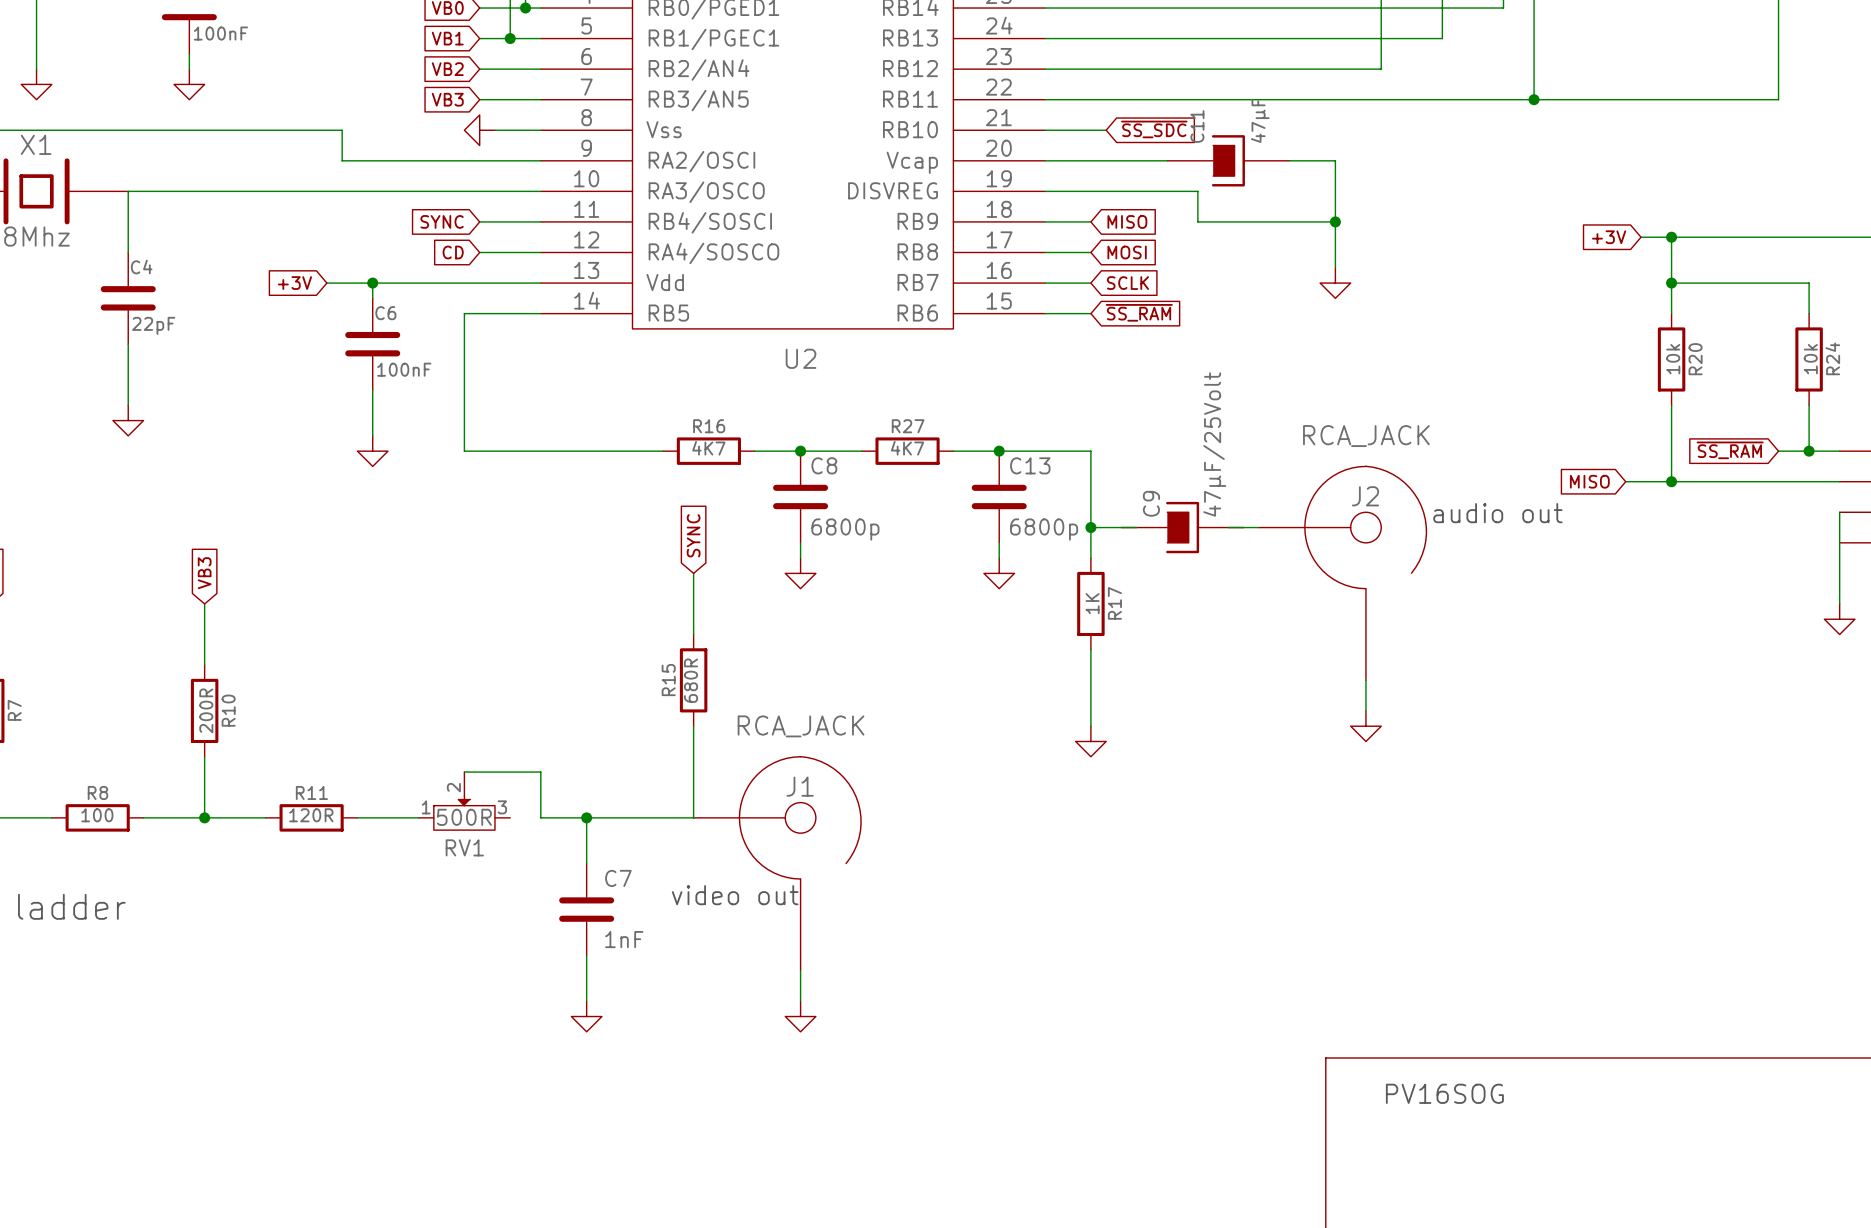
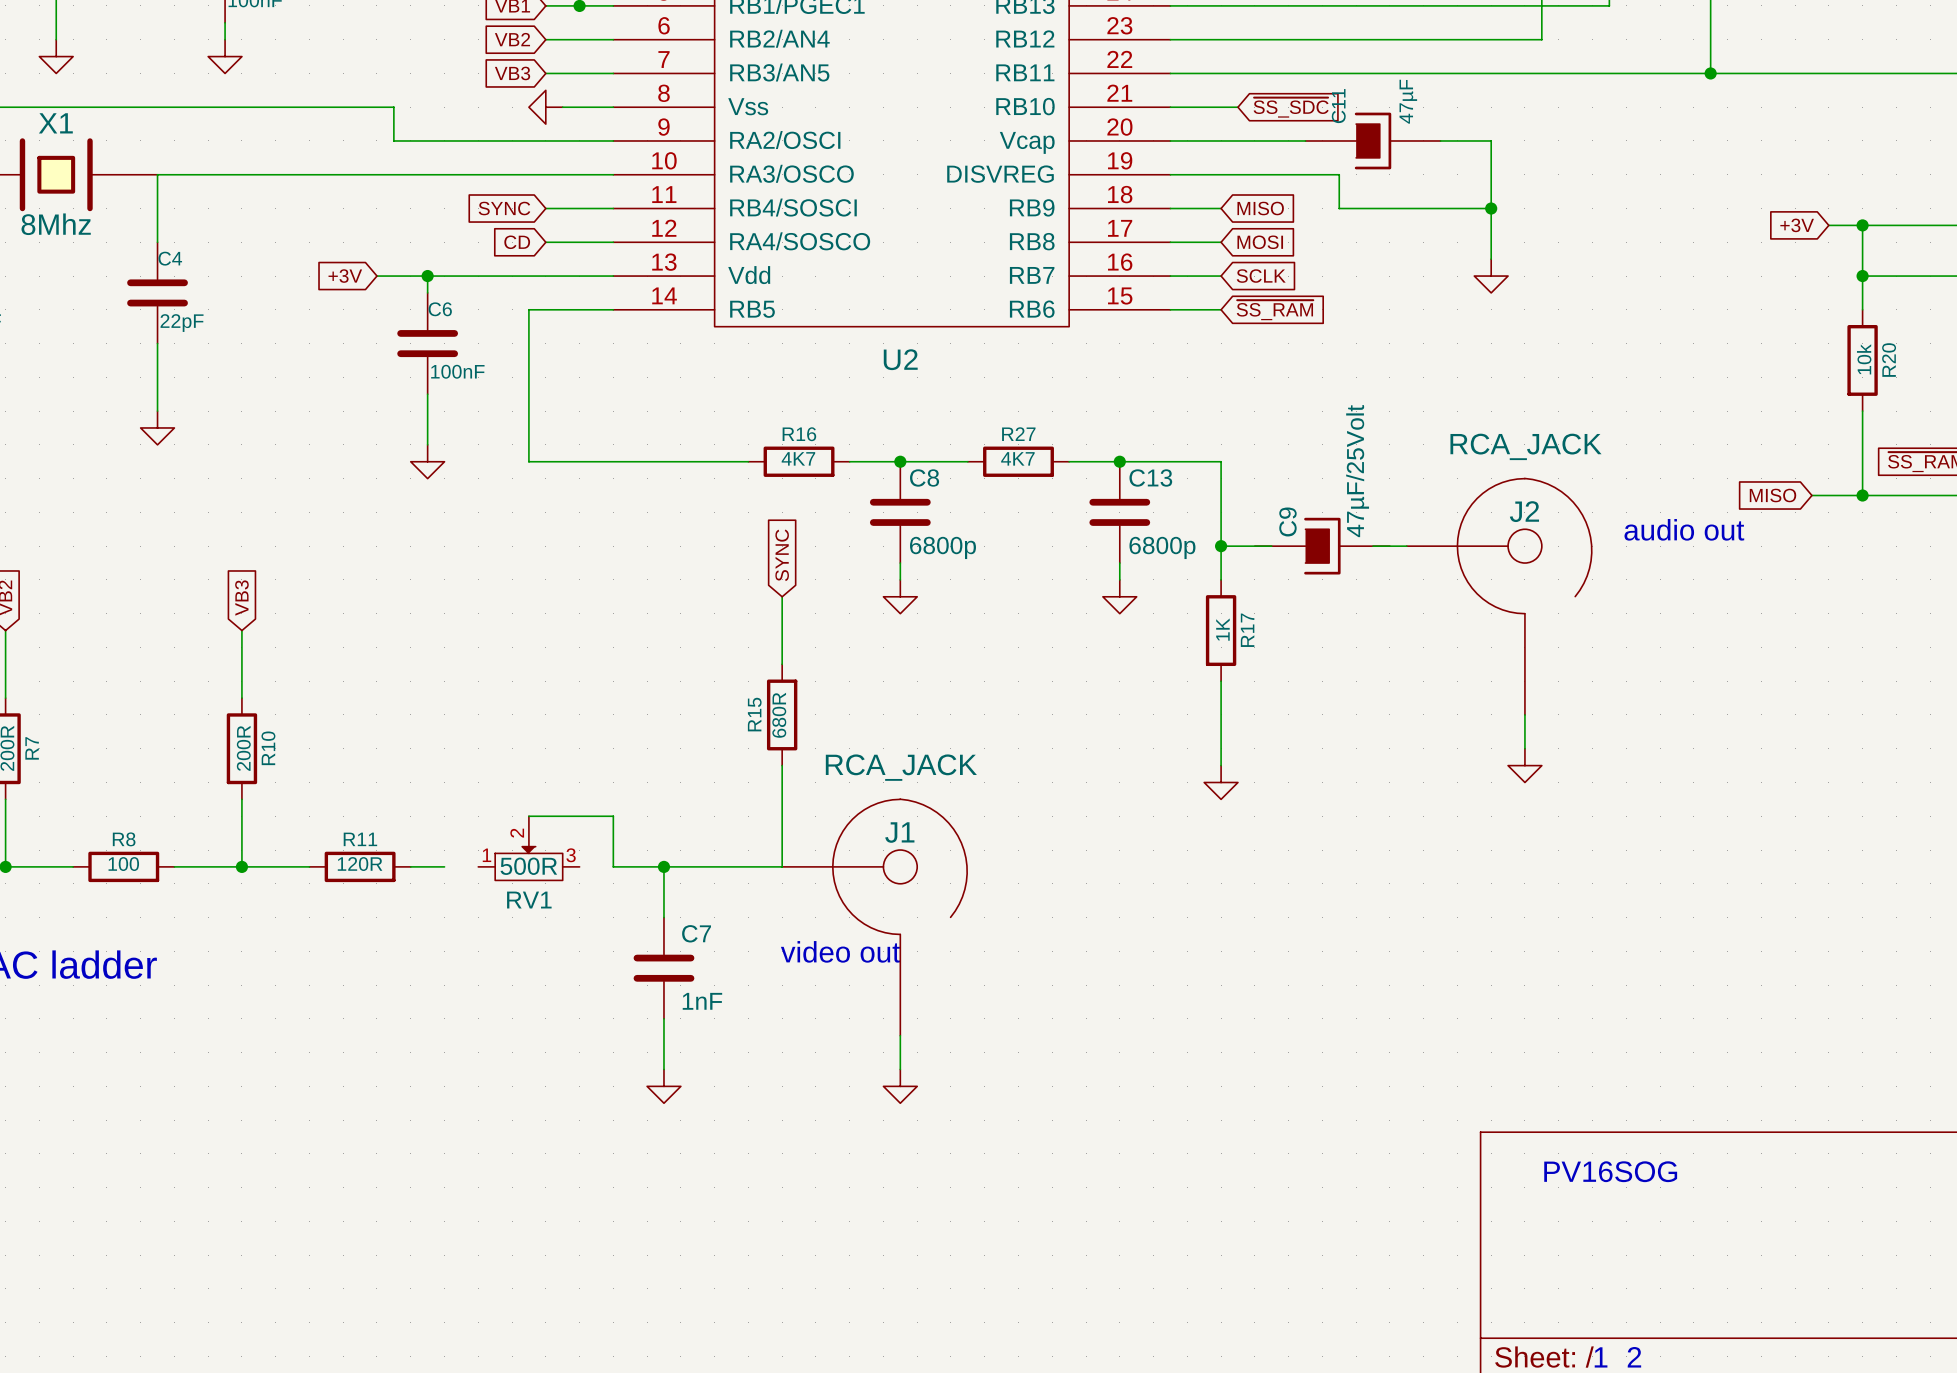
wire: (388, 817) (418, 817) -> none

